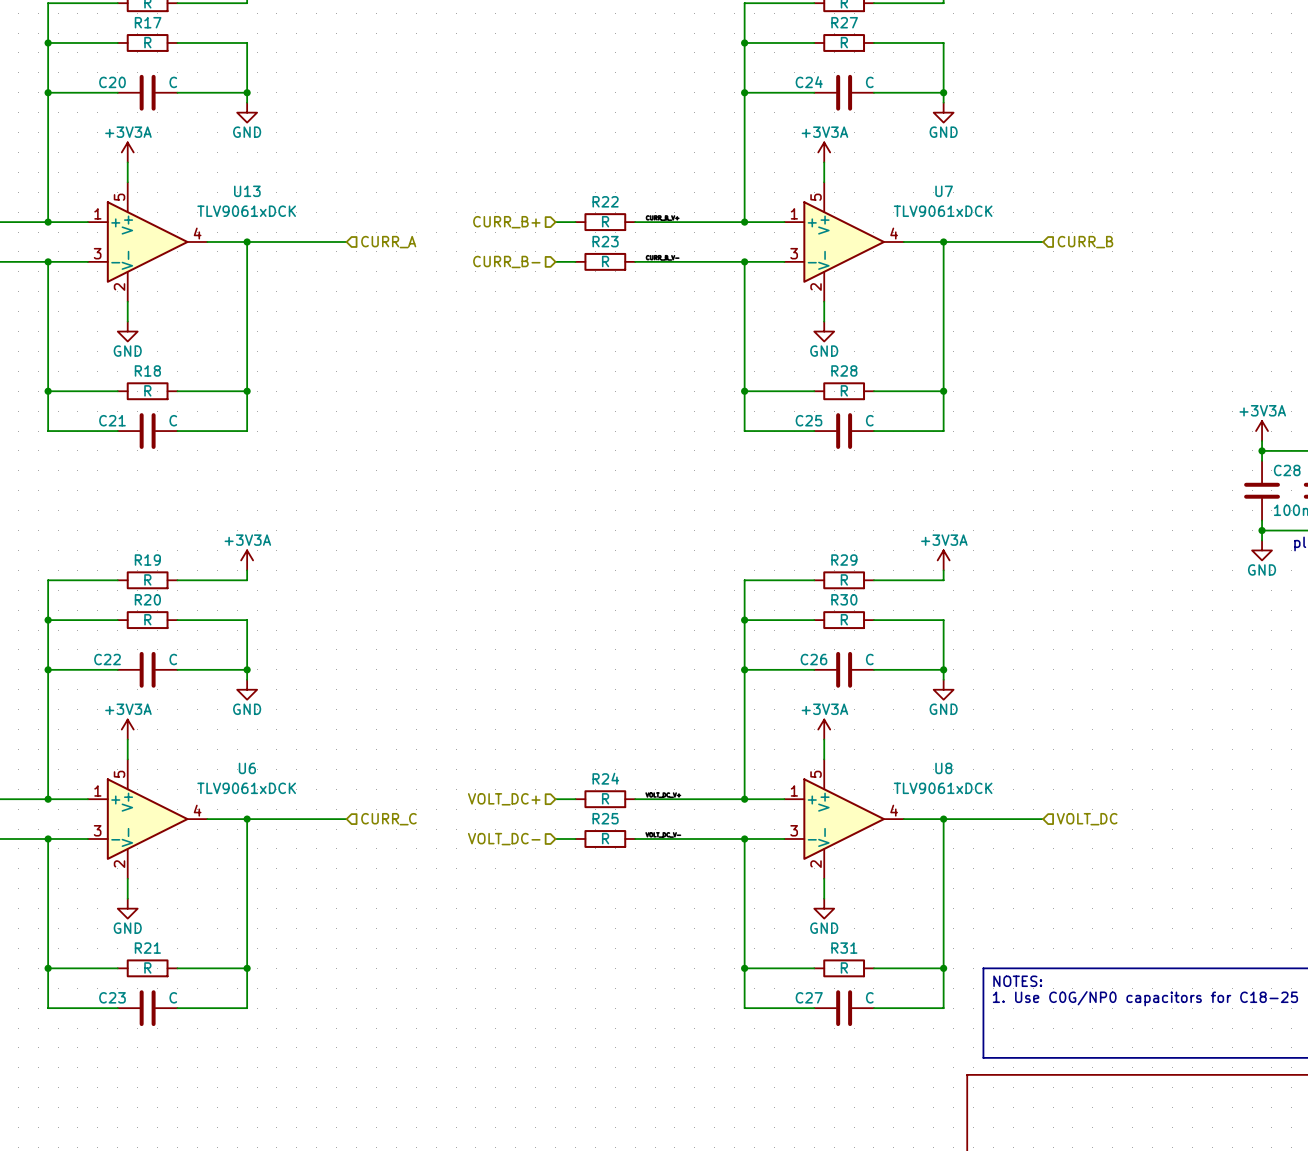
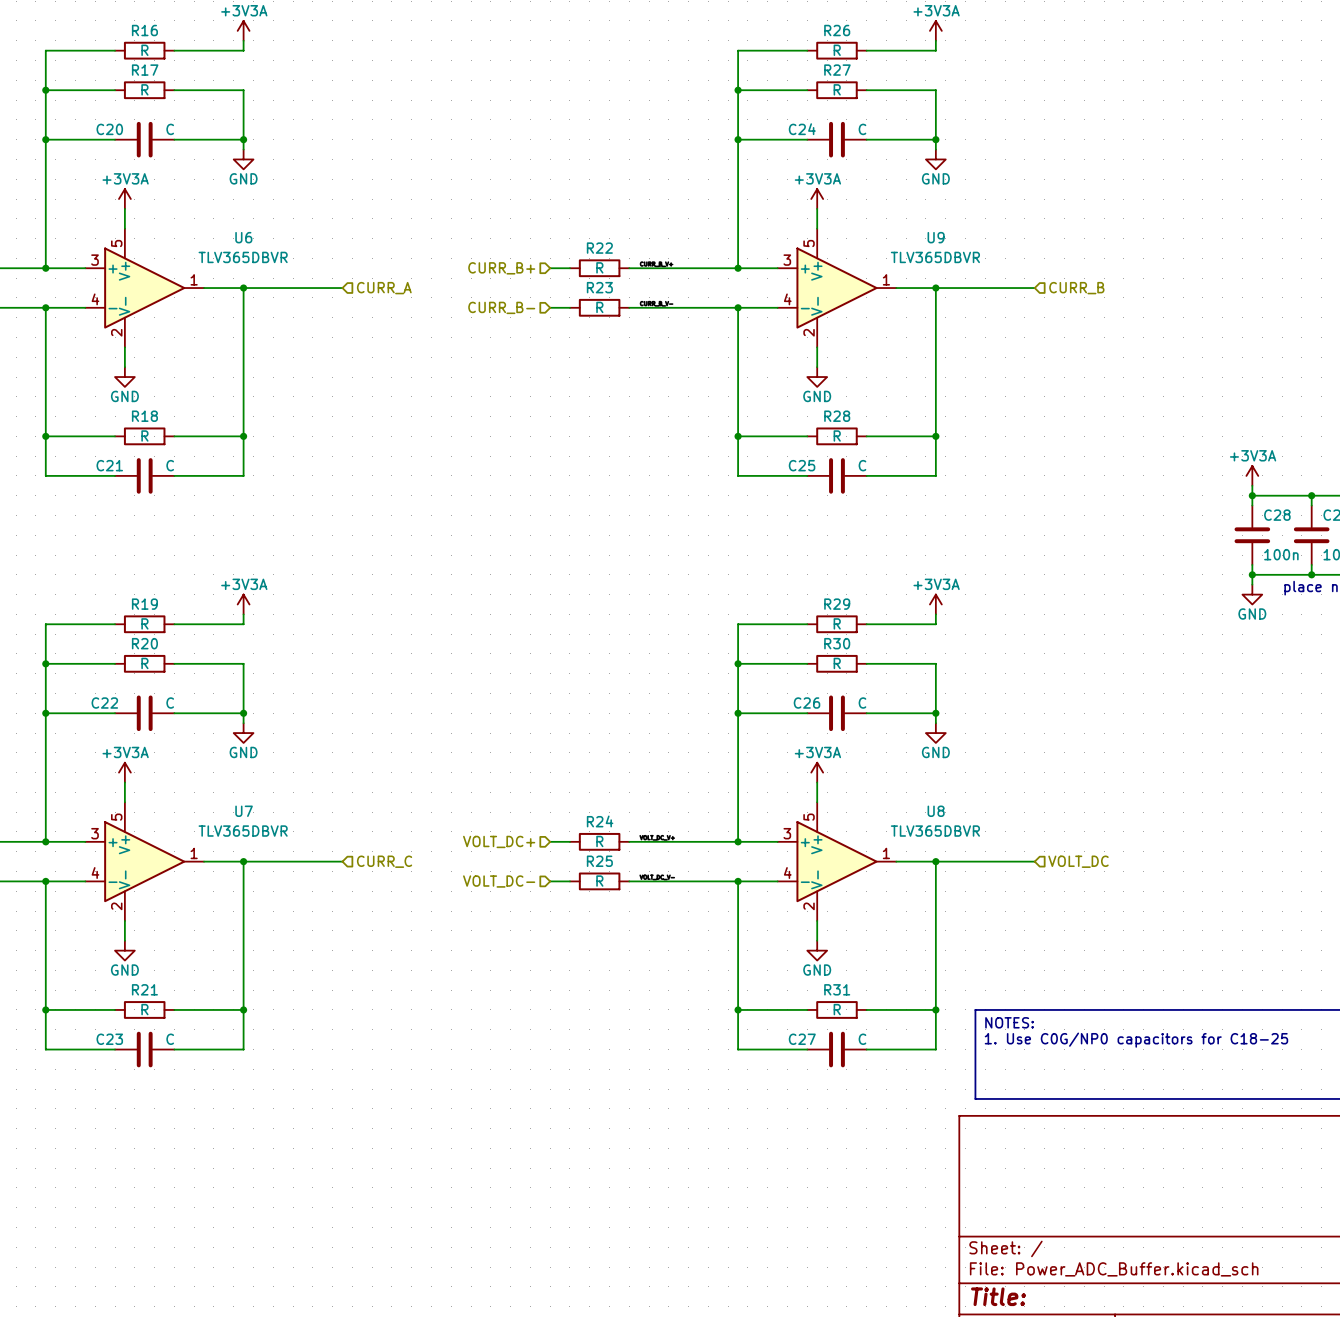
U7 value: TLV9061xDCK (943, 211) -> TLV365DBVR (243, 831)
U7 pin number: 1 (794, 213) -> 3 (95, 833)
U7 pin number: 4 (894, 233) -> 1 (194, 853)
U13: TLV9061xDCK (147, 241) -> none
U7 position: (844, 241) -> (144, 861)
U9: none -> TLV365DBVR (836, 288)
U7 pin number: 3 (794, 253) -> 4 (95, 873)
U6 value: TLV9061xDCK (246, 788) -> TLV365DBVR (243, 257)
U8 value: TLV9061xDCK (943, 788) -> TLV365DBVR (935, 831)
U6 pin number: 1 (97, 790) -> 3 (95, 260)
U8 pin number: 1 (794, 790) -> 3 (787, 833)
U6 pin number: 4 (197, 810) -> 1 (194, 279)
U8 pin number: 4 (894, 810) -> 1 (886, 853)
U6 position: (147, 819) -> (144, 288)
U6 pin number: 3 (97, 830) -> 4 (95, 299)
U8 pin number: 3 (794, 830) -> 4 (787, 873)

